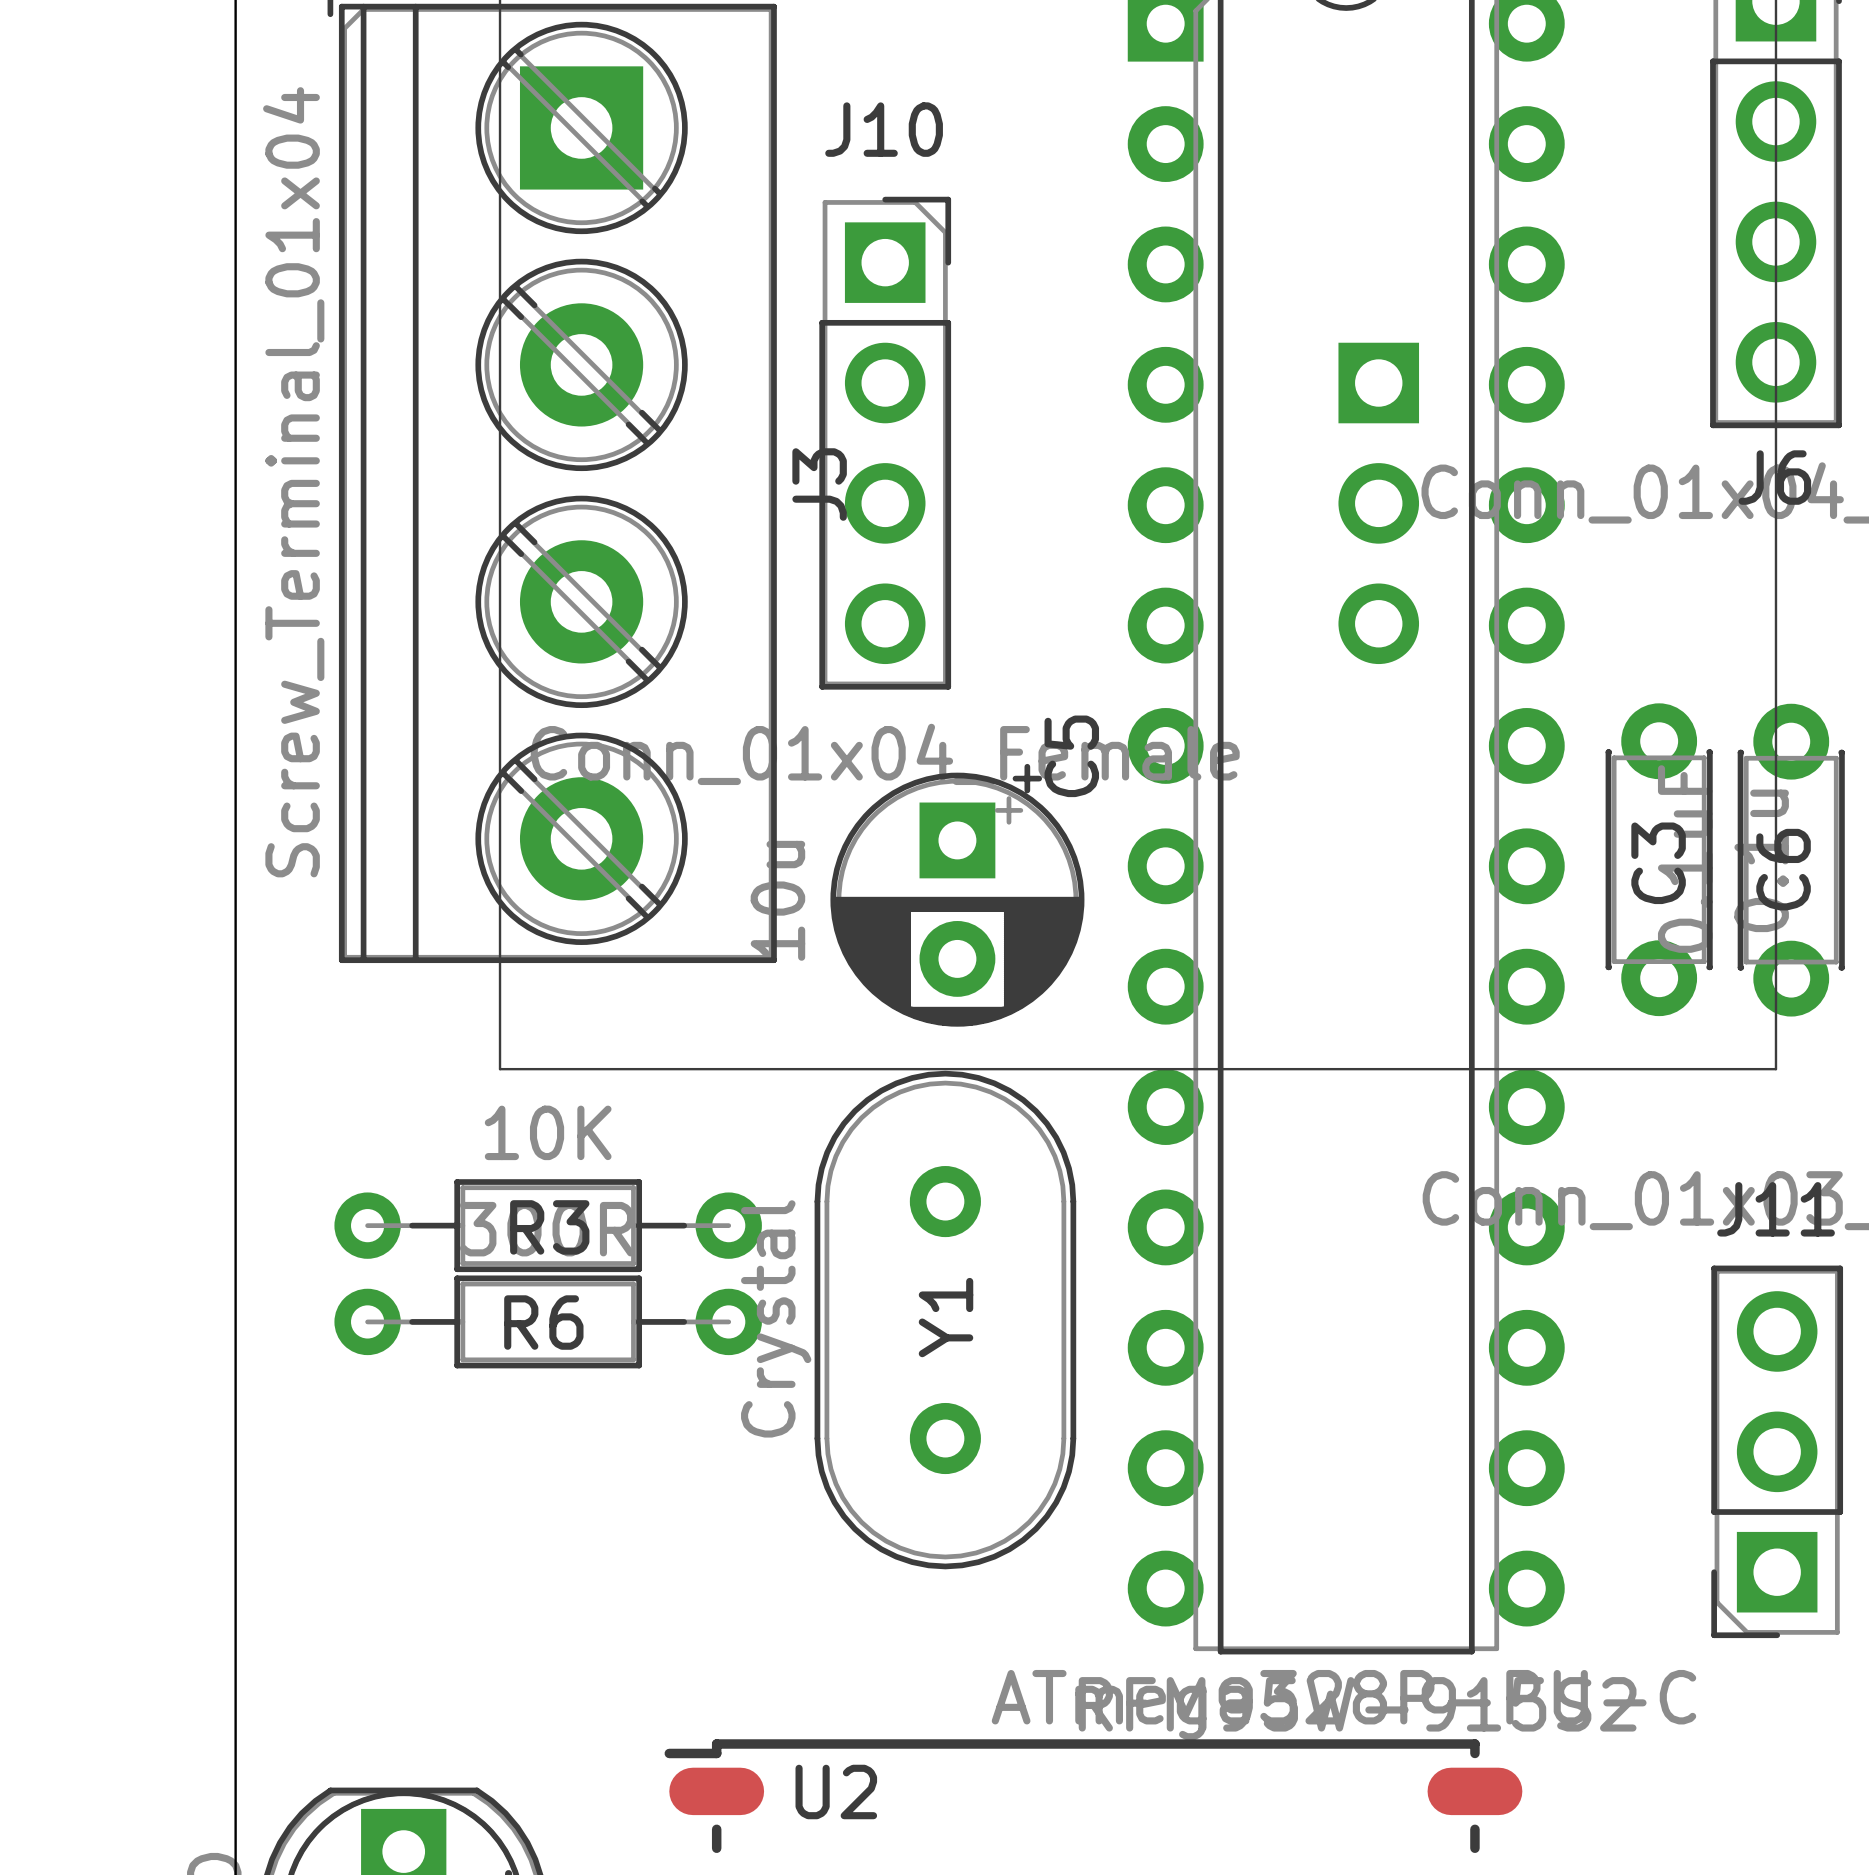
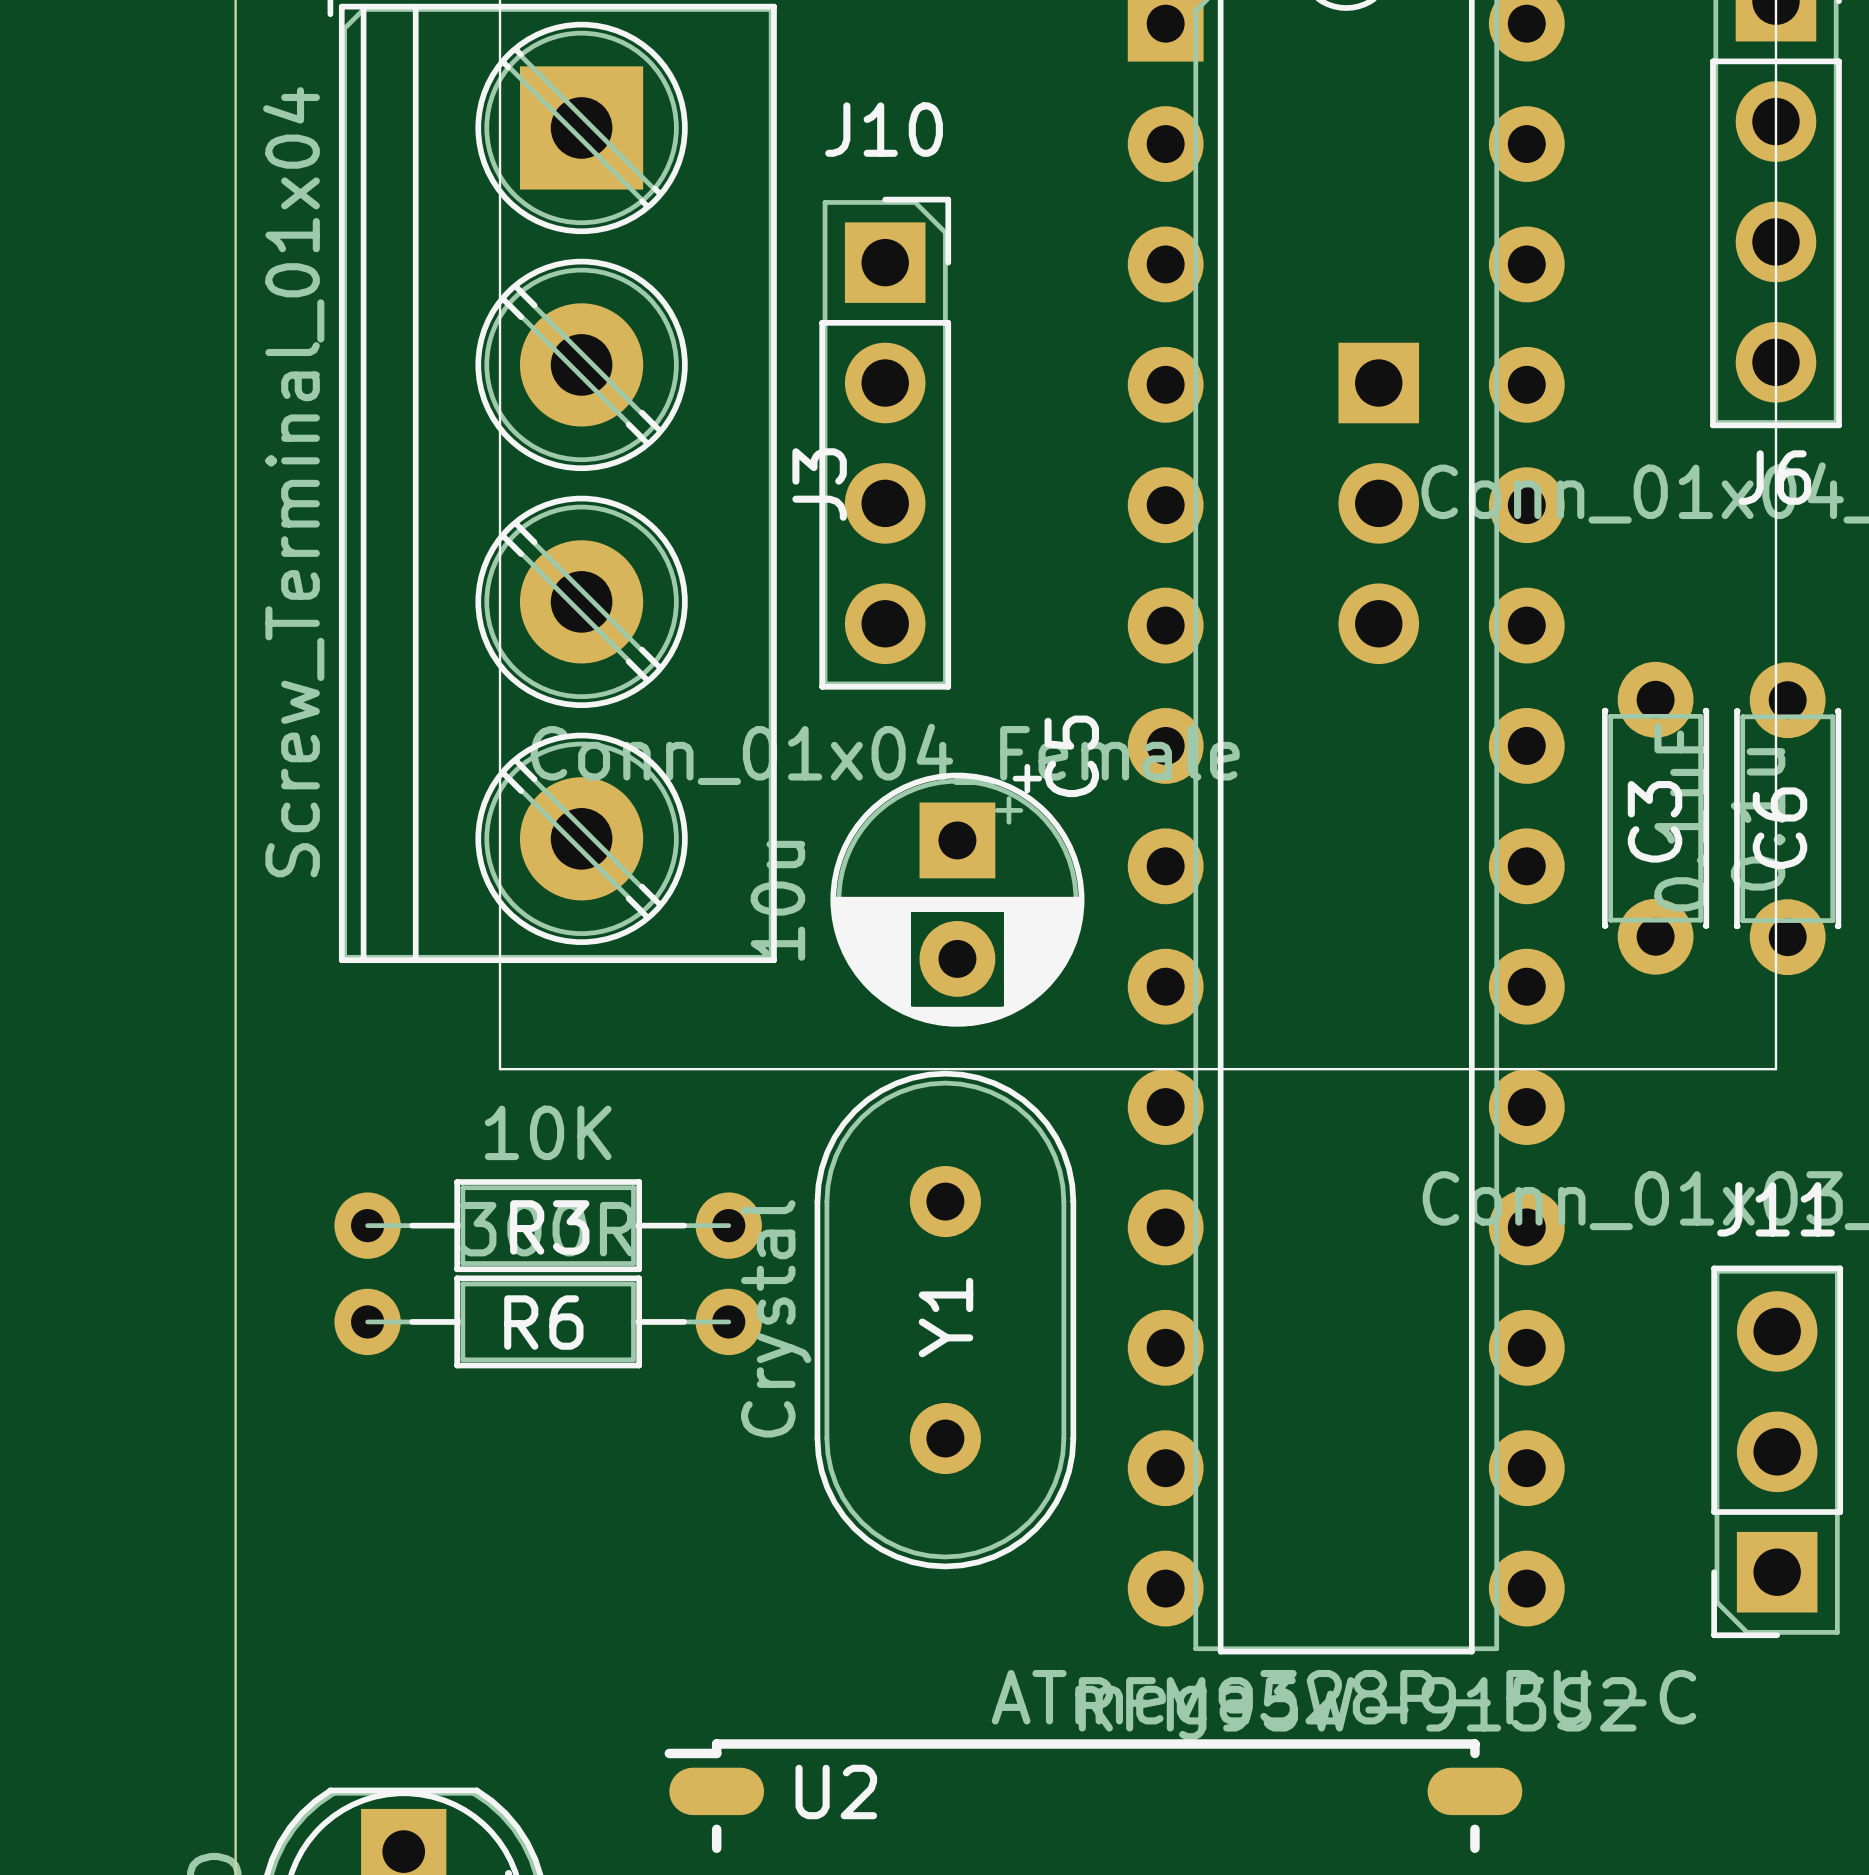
C3 position: (1659, 859) -> (1655, 818)
C6 position: (1791, 860) -> (1787, 818)

